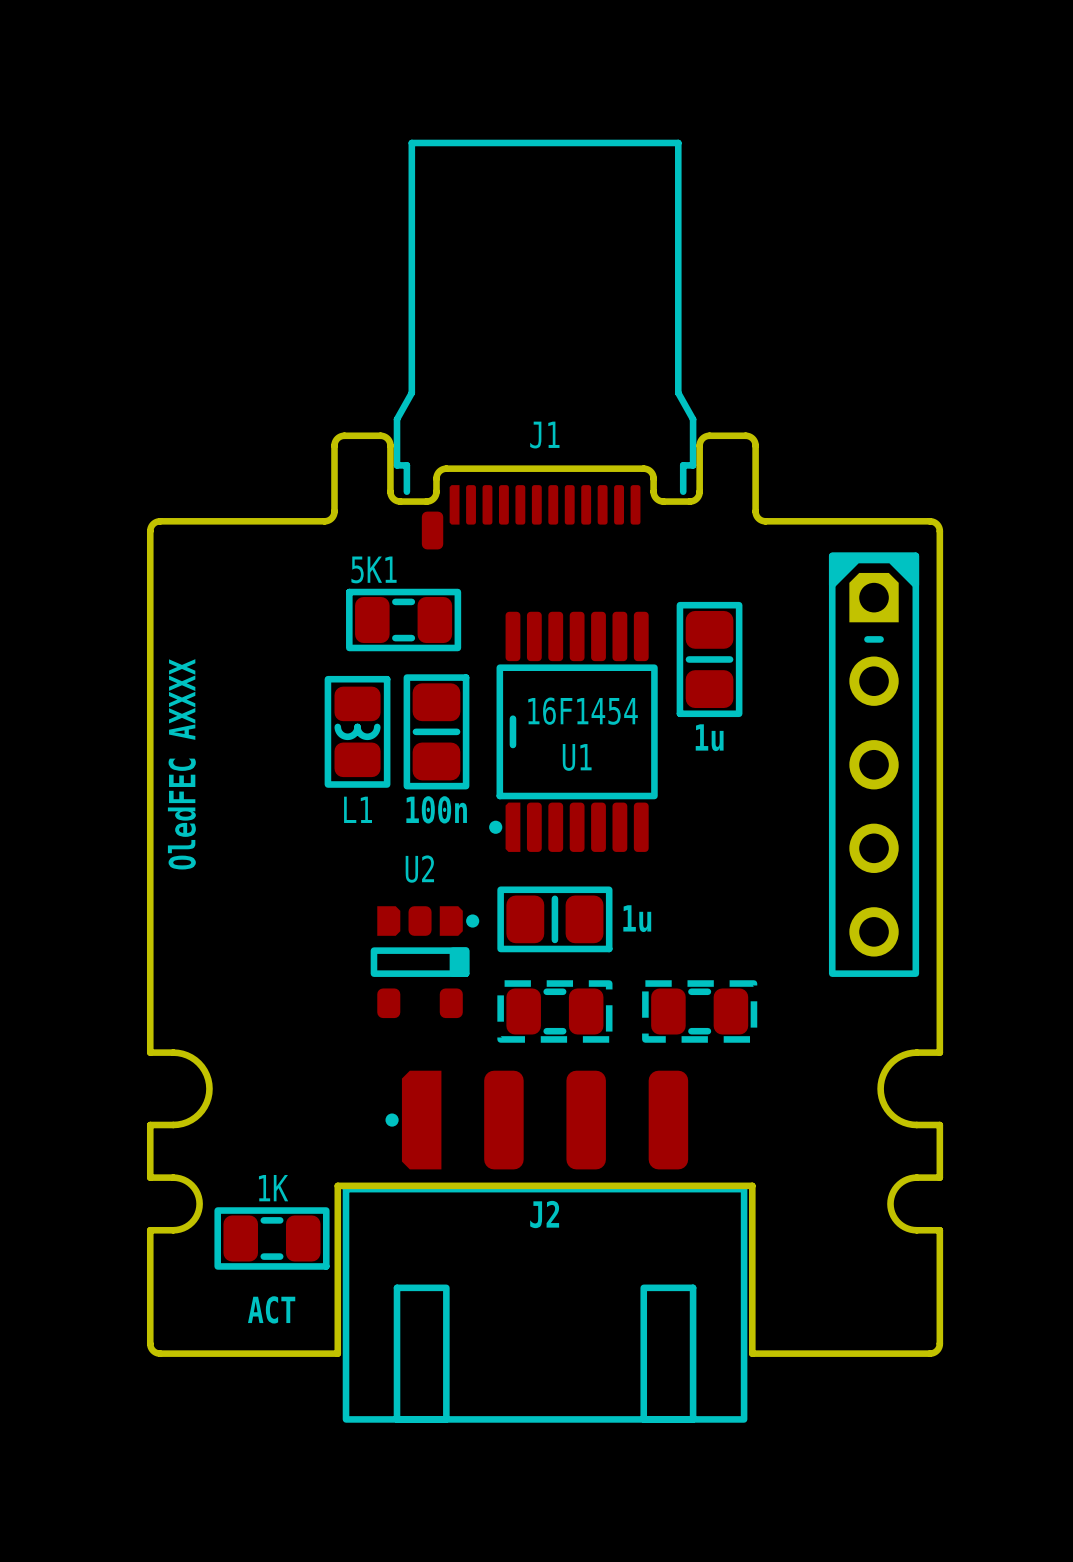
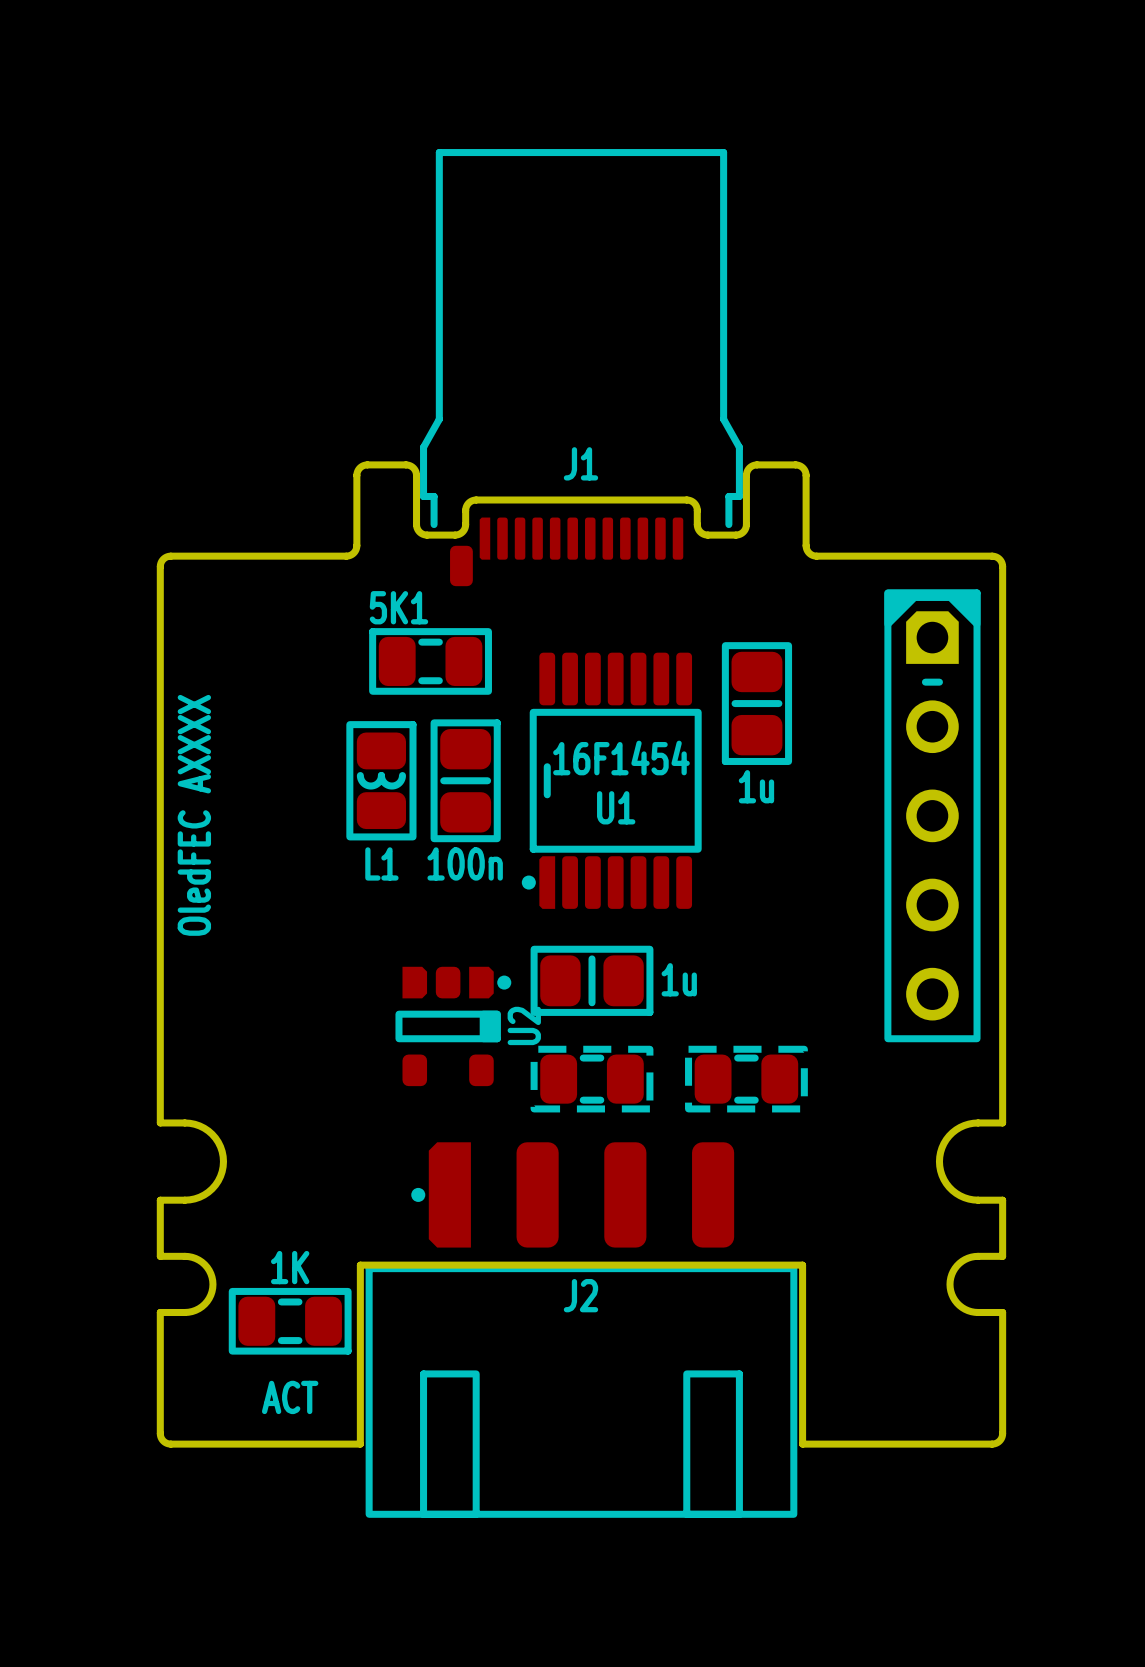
U2 name rotation: 0° (419, 869) -> 90° counterclockwise (524, 1025)
U2 name position: U2 (419, 869) -> U2 (524, 1025)

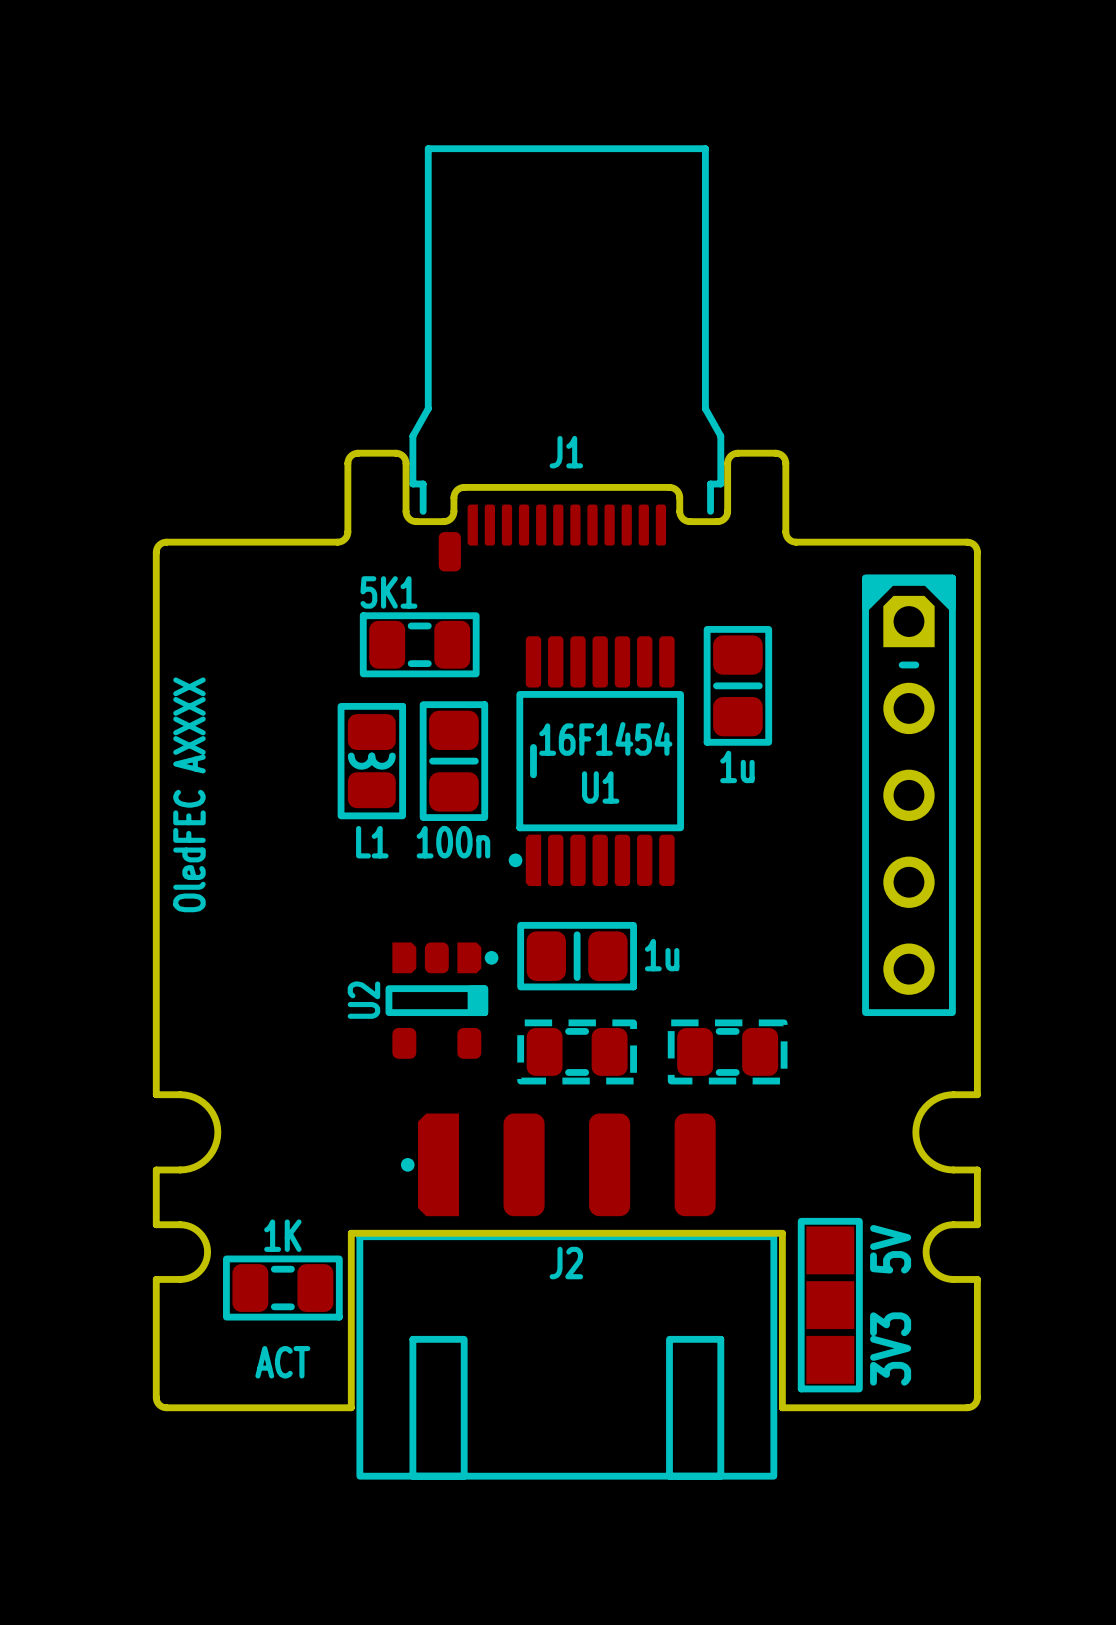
U2 name position: U2 (524, 1025) -> U2 (363, 1000)
text: none -> 5V (890, 1249)
part: none -> (830, 1305)
text: none -> 3V3 (890, 1349)

